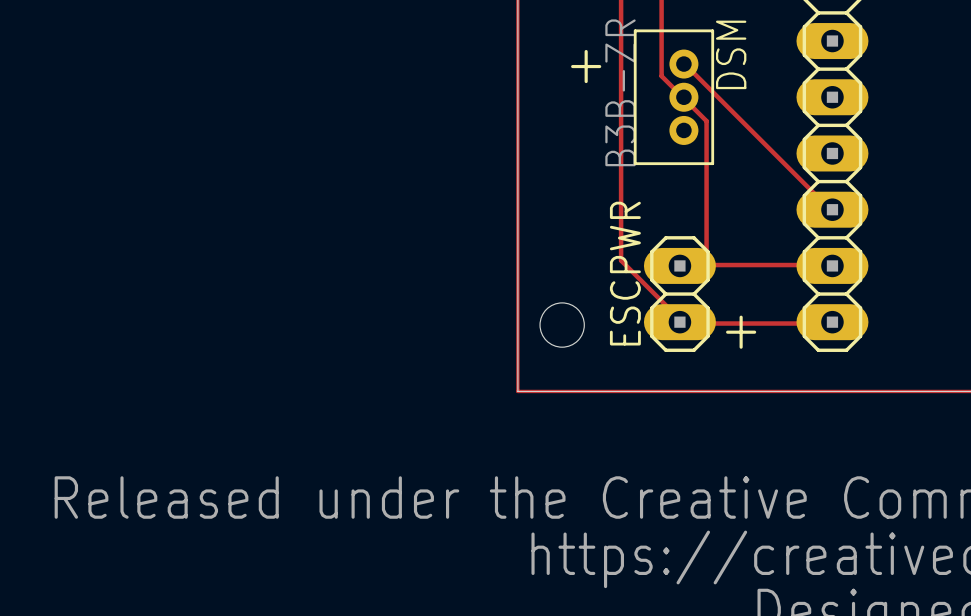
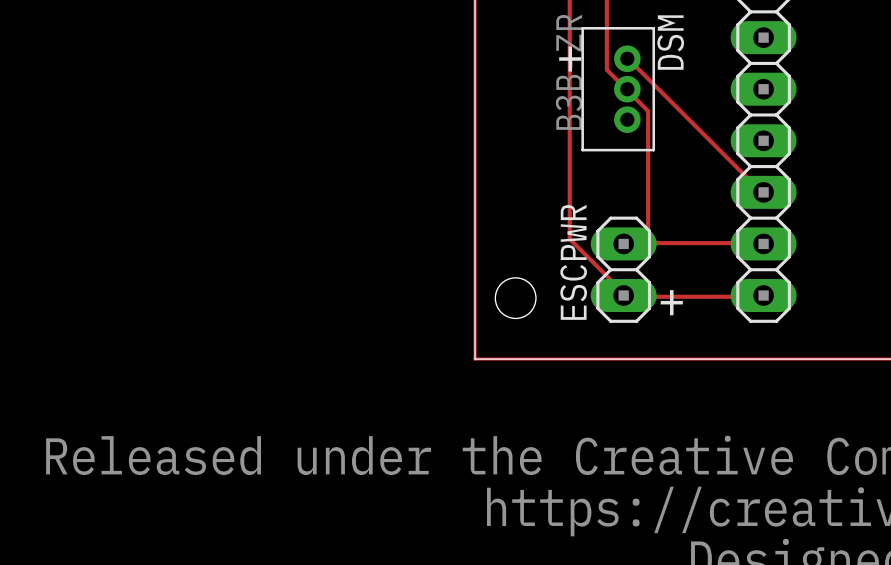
text position: + (586, 66) -> + (570, 59)

